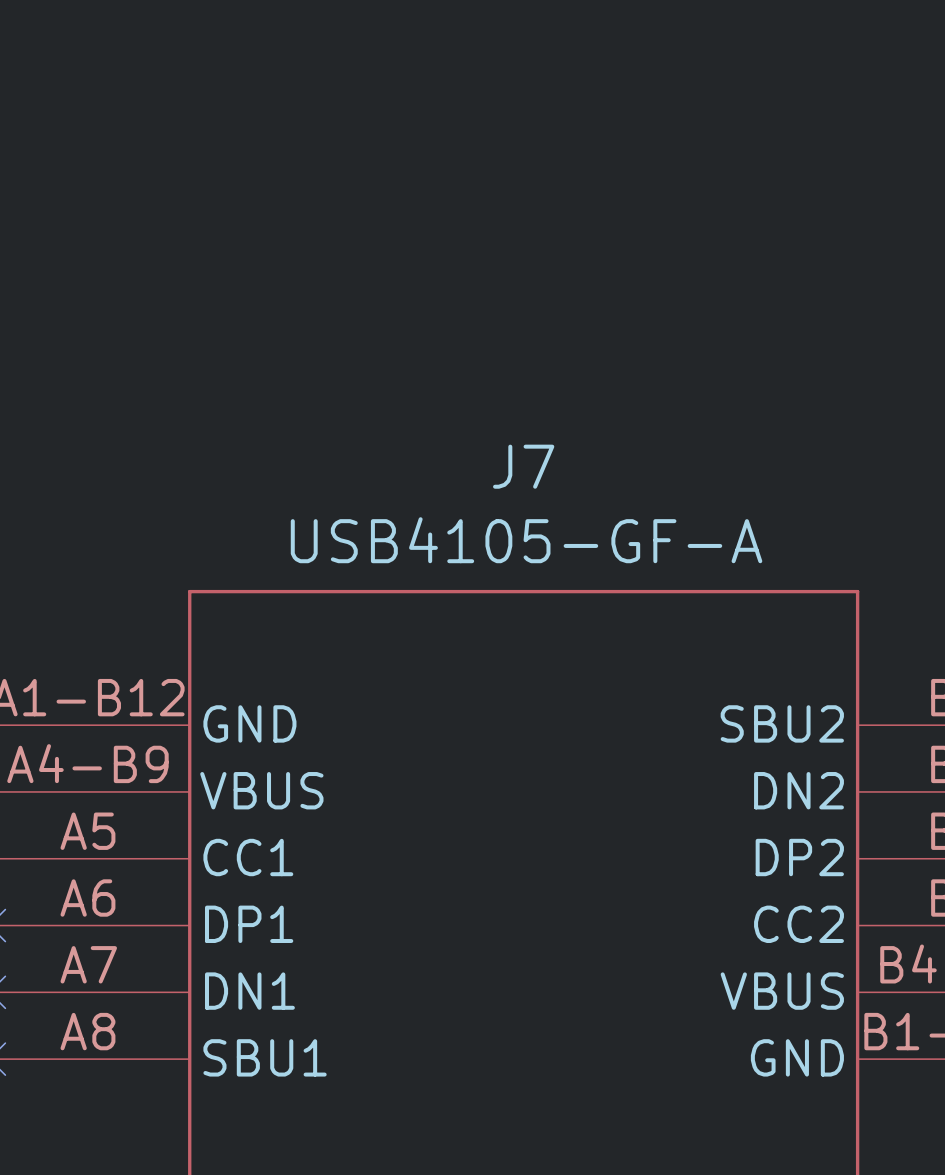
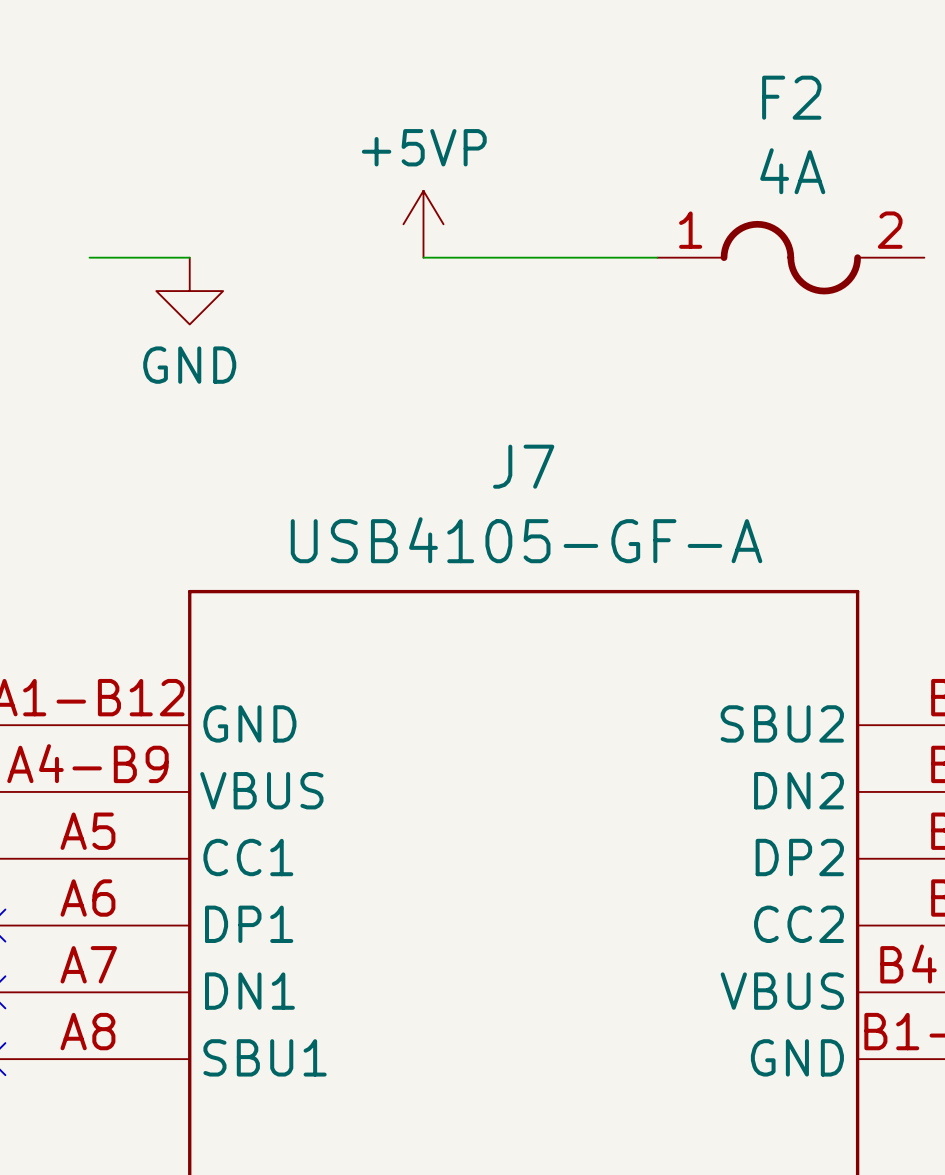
power symbol: none -> +5VP (423, 224)
wire: none -> (89, 257) (189, 257)
wire: none -> (423, 257) (657, 257)
F2: none -> 4A (790, 257)
power symbol: none -> GND (189, 291)

